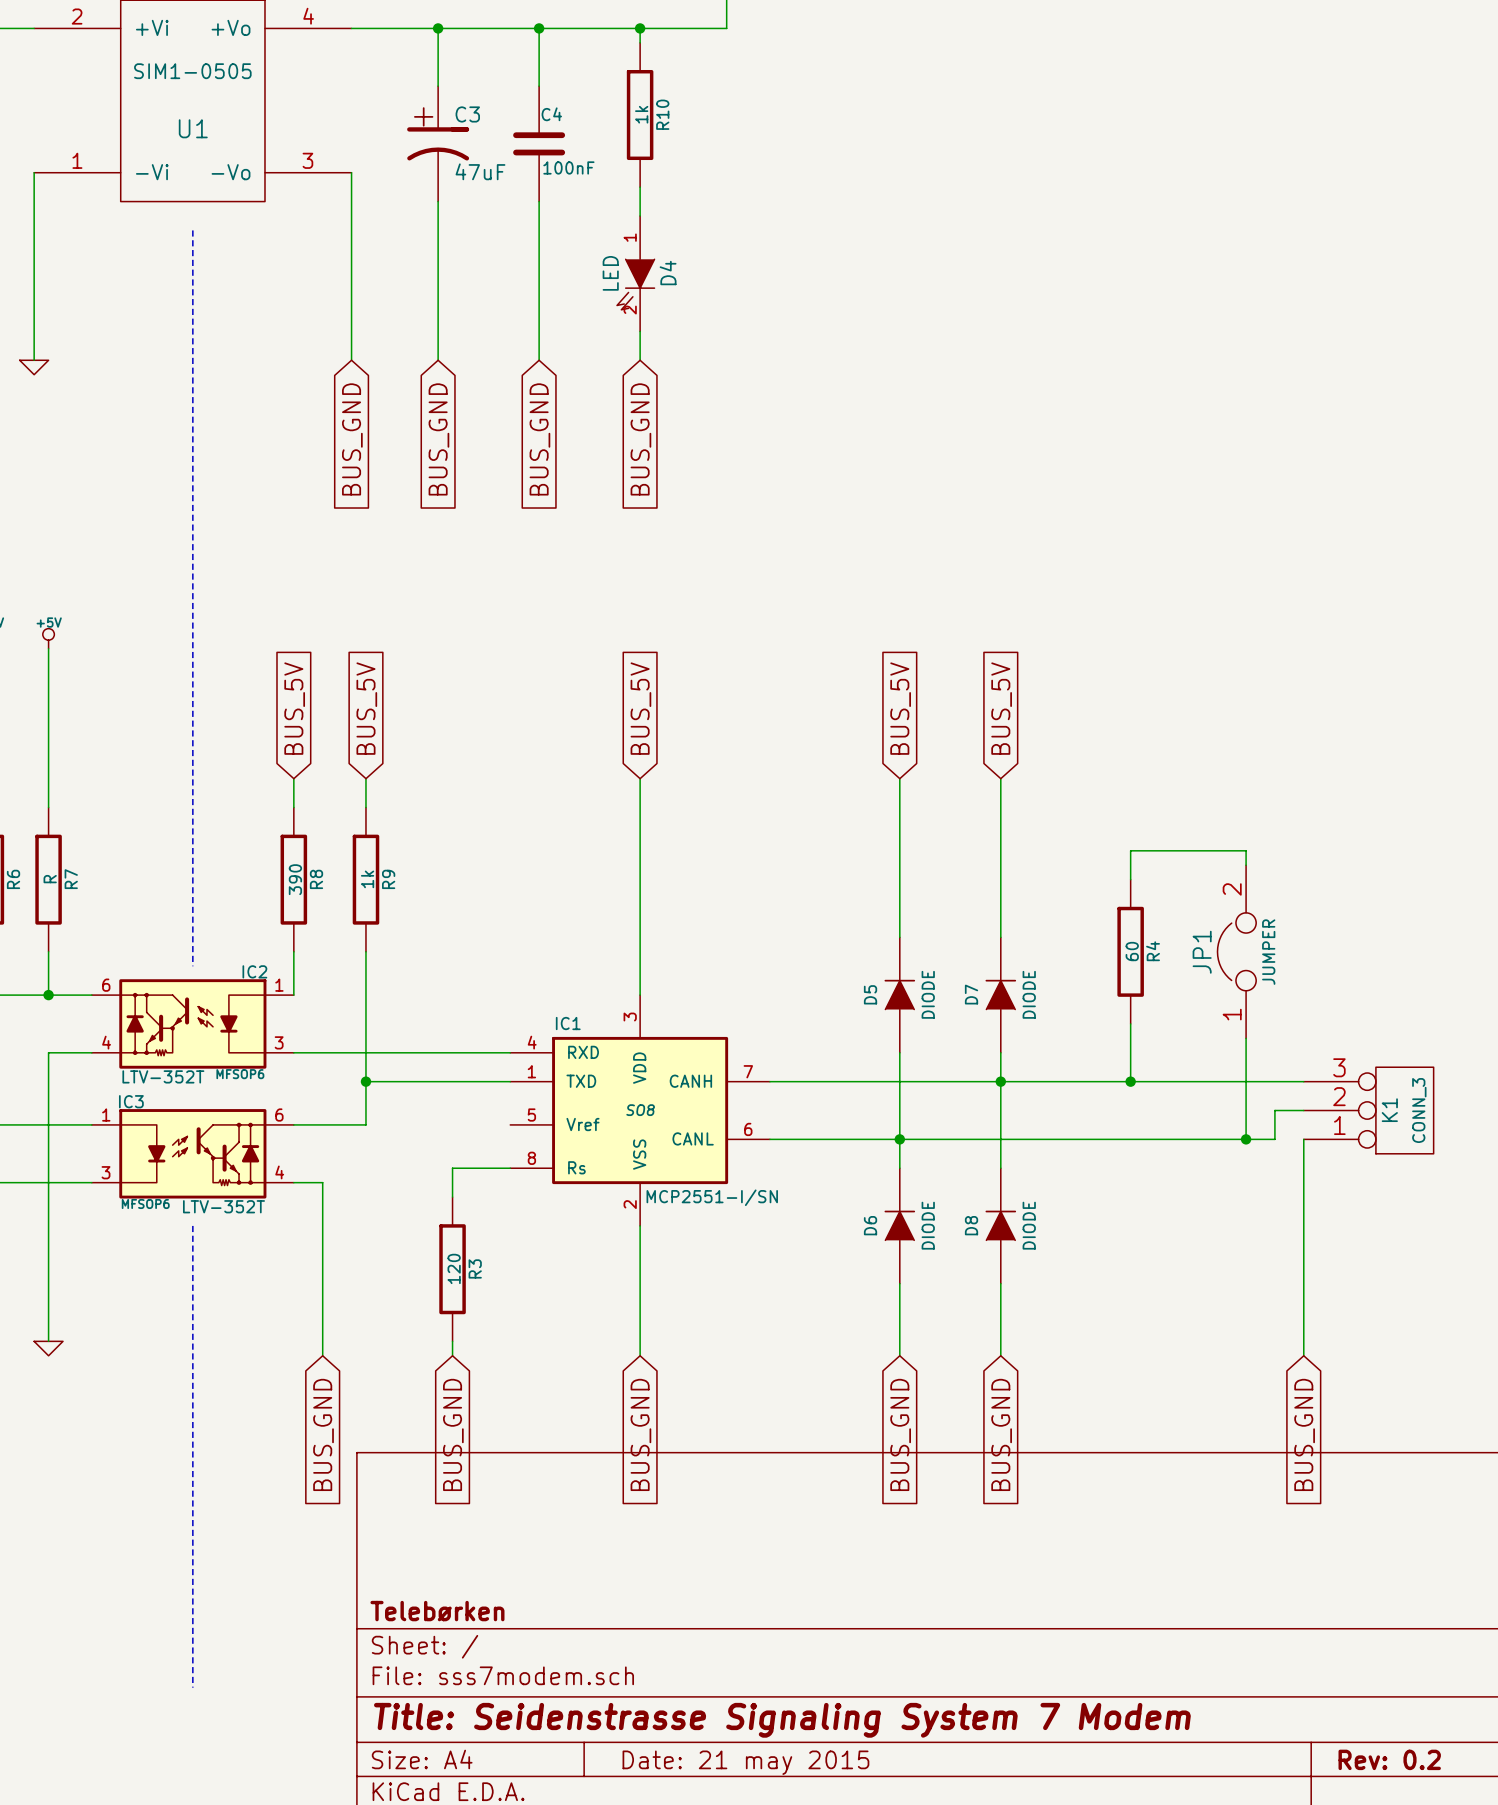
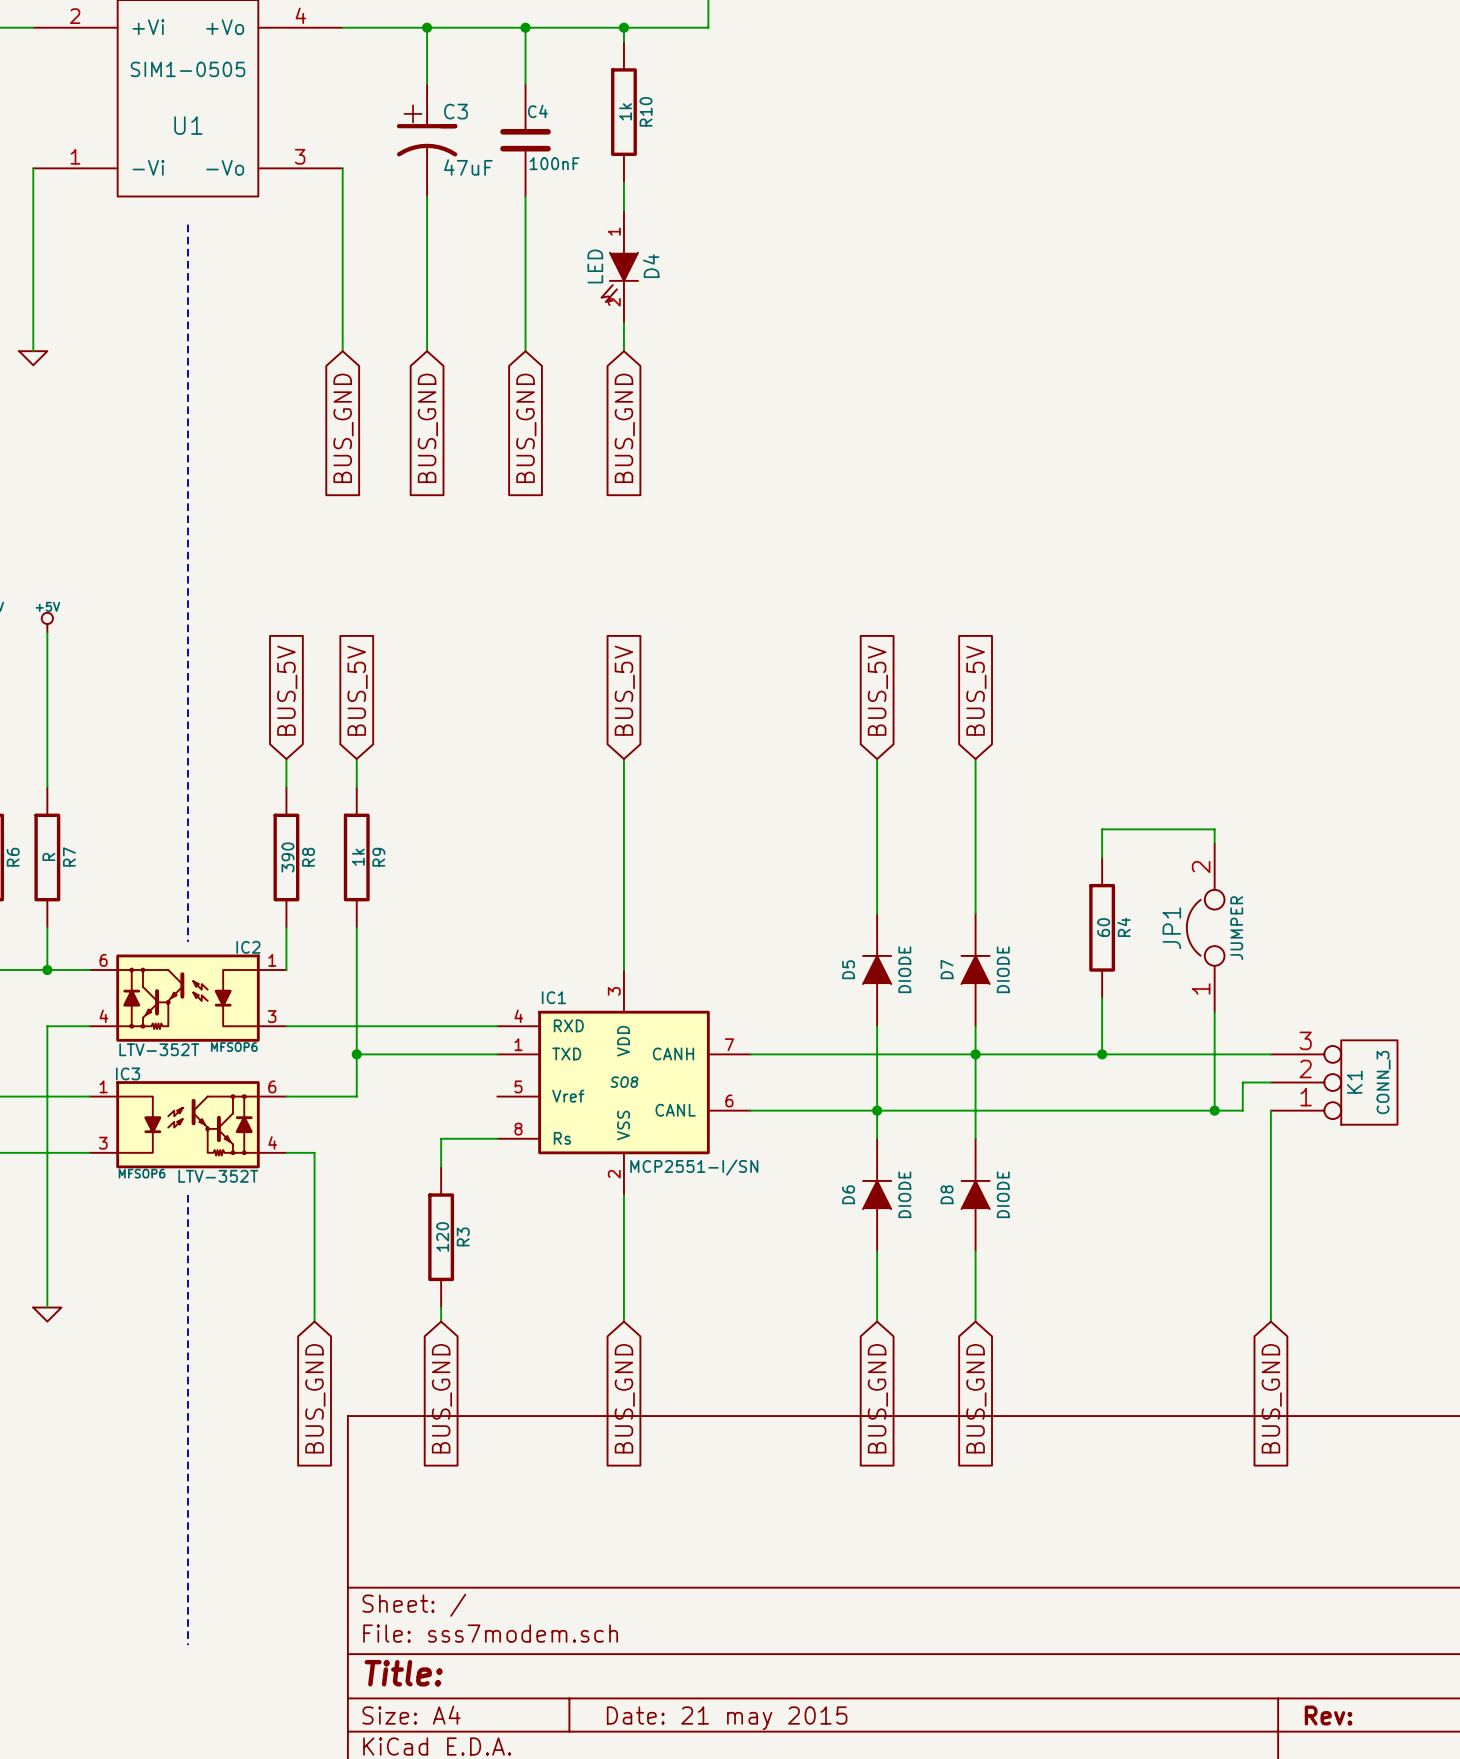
title block: Telebørken (437, 1611) -> none
title block: Title: Seidenstrasse Signaling System 7 Modem (782, 1720) -> Title: (403, 1673)
title block: Rev: 0.2 (1389, 1759) -> Rev: (1328, 1715)

